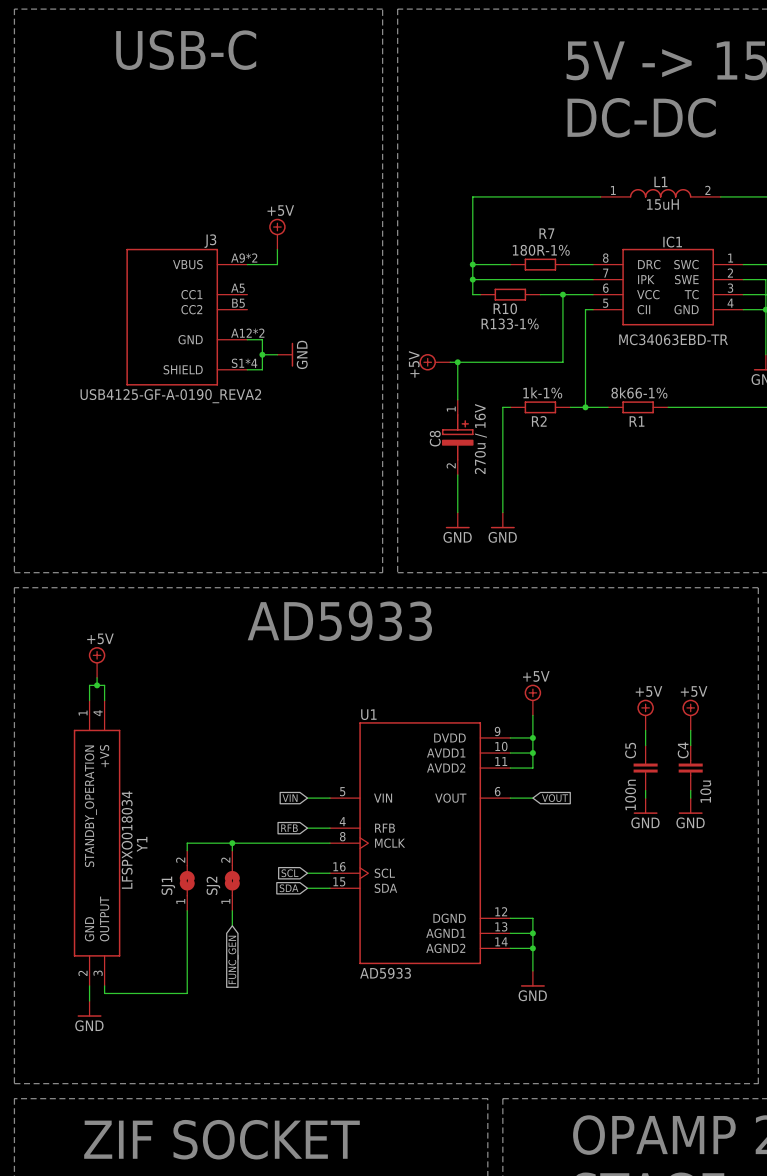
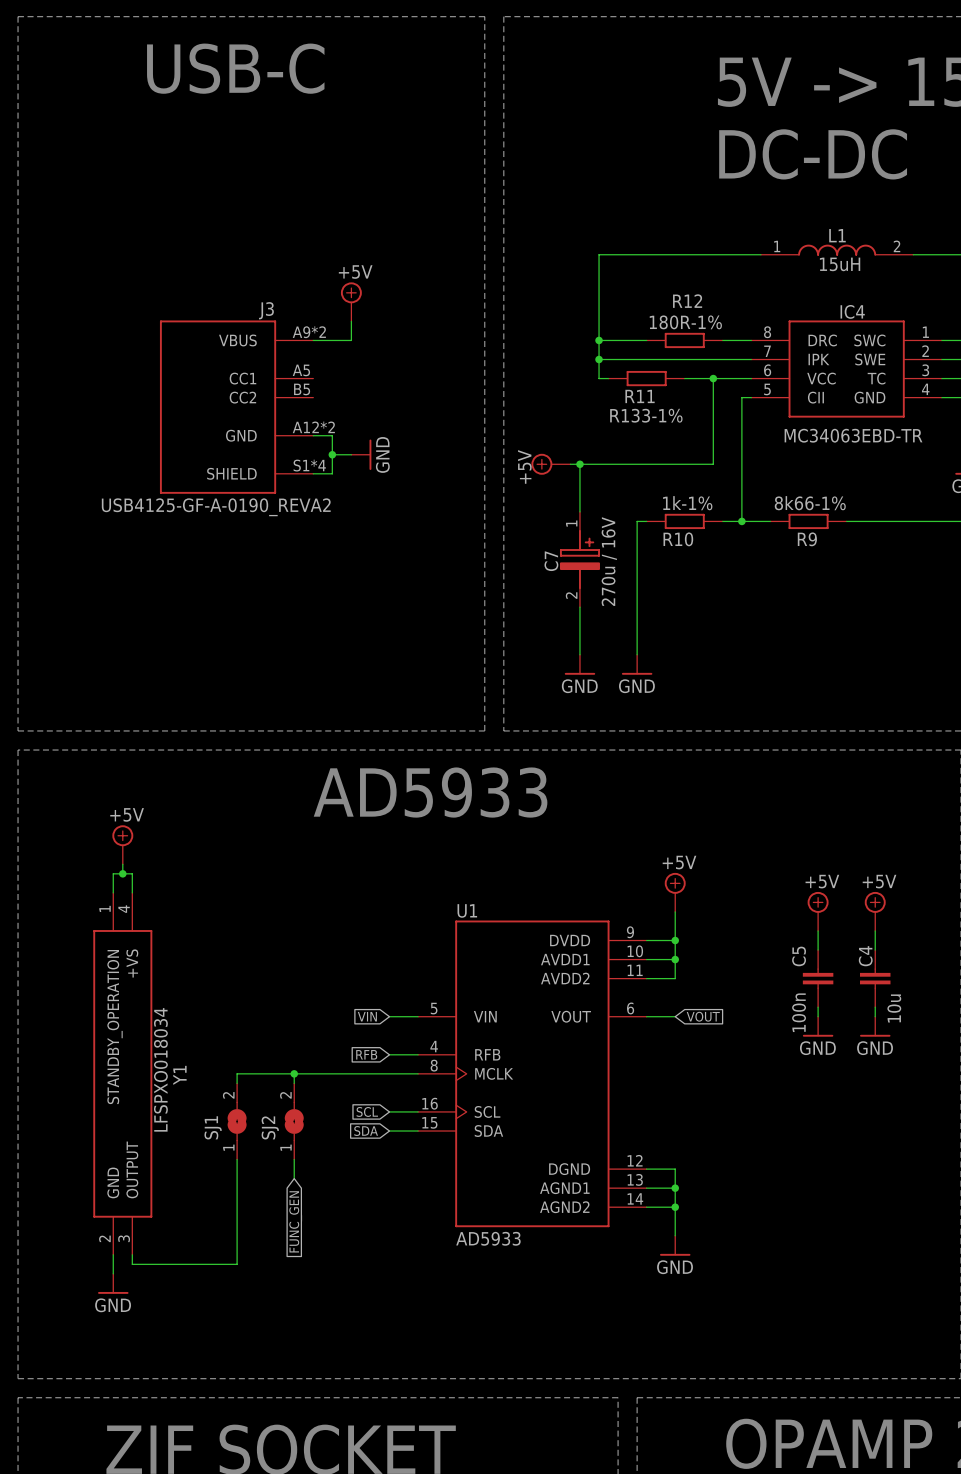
R7 name: R7 (546, 233) -> R12 (687, 301)
IC1 name: IC1 (672, 242) -> IC4 (852, 311)
R10 name: R10 (505, 308) -> R11 (640, 396)
R2 name: R2 (539, 421) -> R10 (678, 539)
R1 name: R1 (637, 421) -> R9 (807, 539)
C8 name: C8 (435, 438) -> C7 (551, 561)

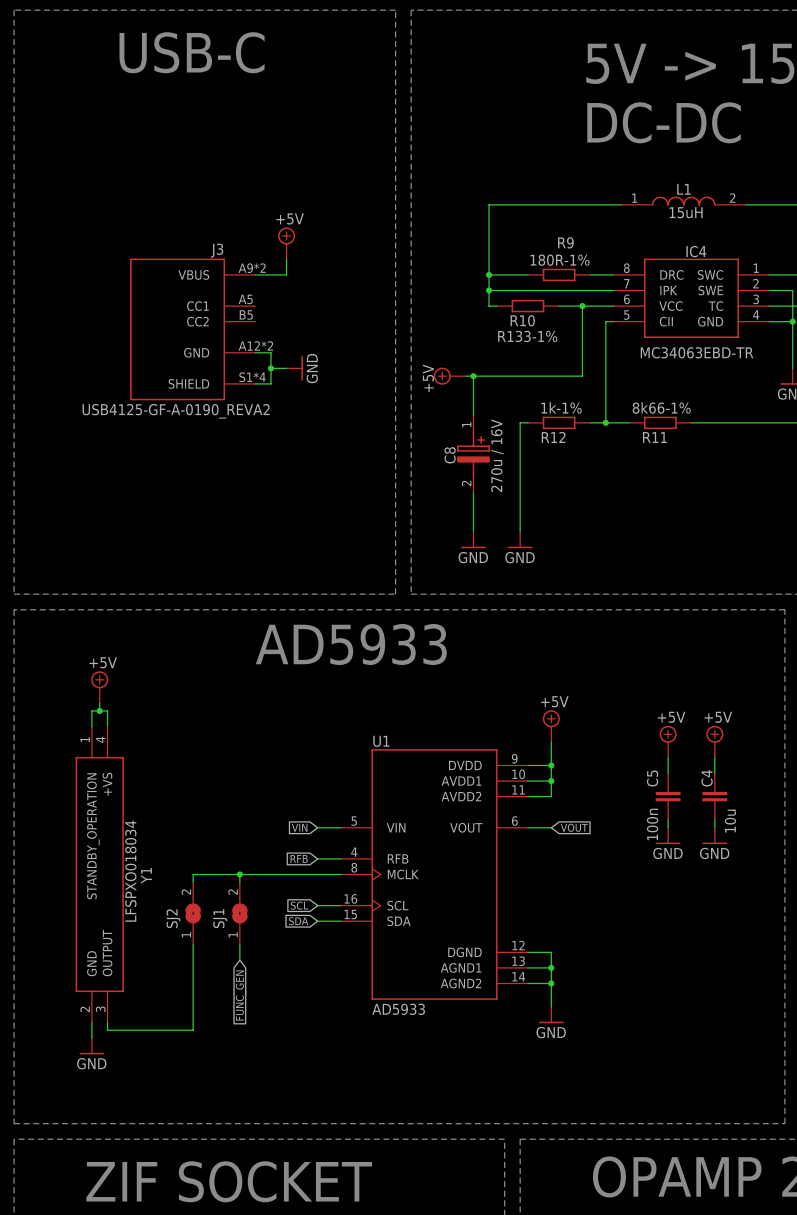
R12 name: R12 (687, 301) -> R9 (565, 242)
R11 name: R11 (640, 396) -> R10 (522, 320)
R10 name: R10 (678, 539) -> R12 (553, 437)
R9 name: R9 (807, 539) -> R11 (654, 437)
C7 name: C7 (551, 561) -> C8 (450, 455)
SJ1 name: SJ1 (213, 1127) -> SJ2 (173, 918)
SJ2 name: SJ2 (270, 1127) -> SJ1 (220, 918)

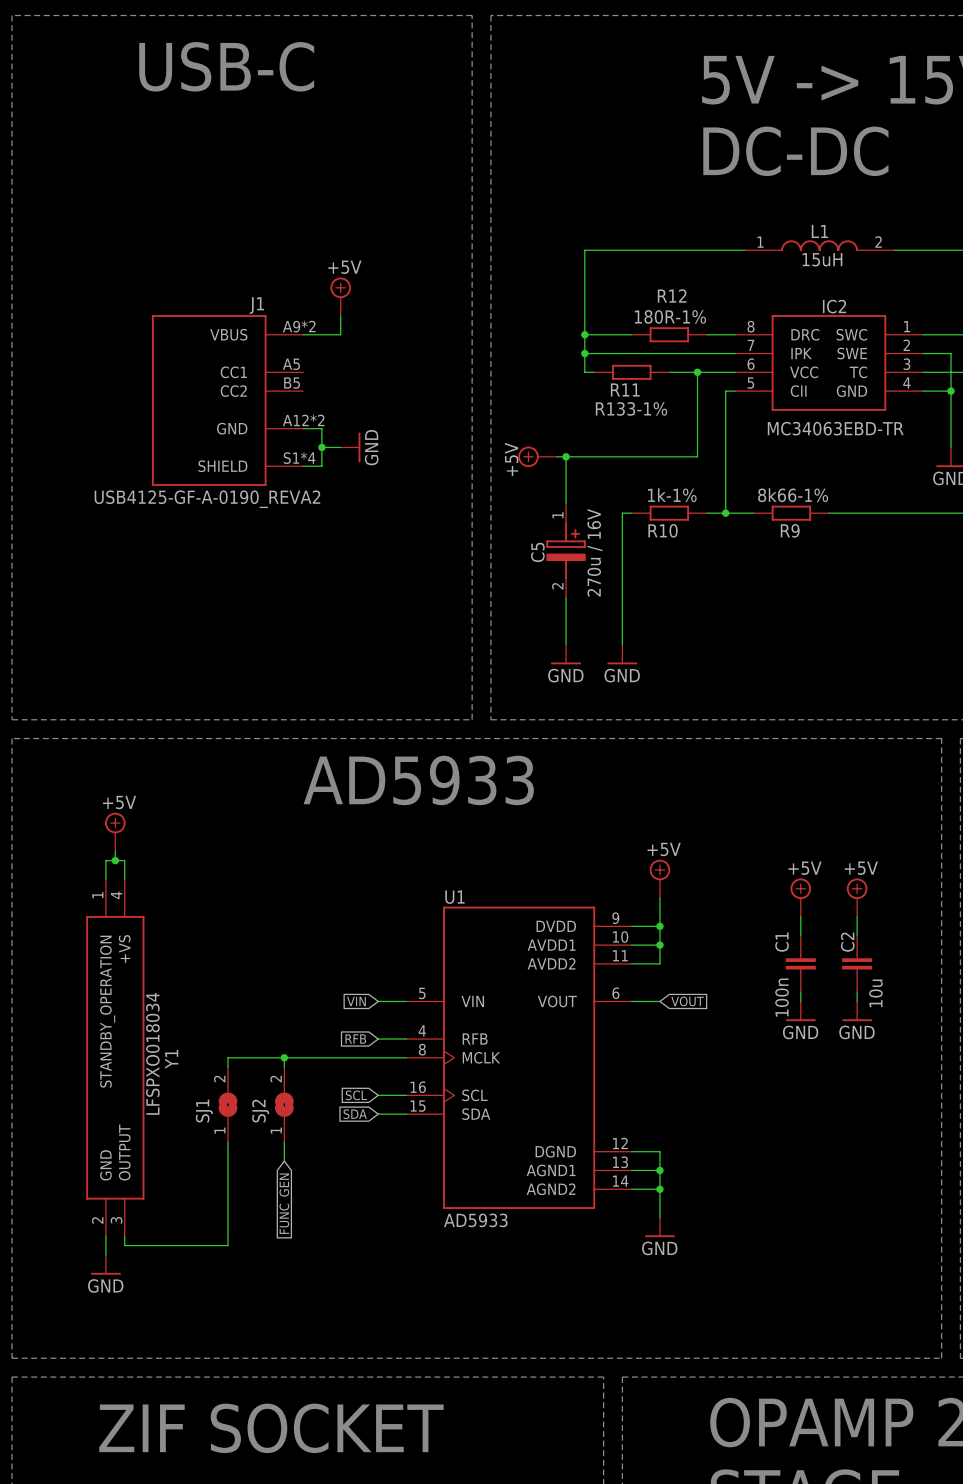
R9 name: R9 (565, 242) -> R12 (672, 295)
J3 name: J3 (217, 250) -> J1 (256, 305)
IC4 name: IC4 (696, 251) -> IC2 (834, 306)
R10 name: R10 (522, 320) -> R11 (625, 389)
R12 name: R12 (553, 437) -> R10 (663, 530)
R11 name: R11 (654, 437) -> R9 (790, 530)
C8 name: C8 (450, 455) -> C5 (537, 552)
C5 name: C5 (652, 778) -> C1 (782, 942)
C4 name: C4 (707, 778) -> C2 (847, 942)
SJ2 name: SJ2 (173, 918) -> SJ1 (204, 1111)
SJ1 name: SJ1 (220, 918) -> SJ2 (260, 1111)

